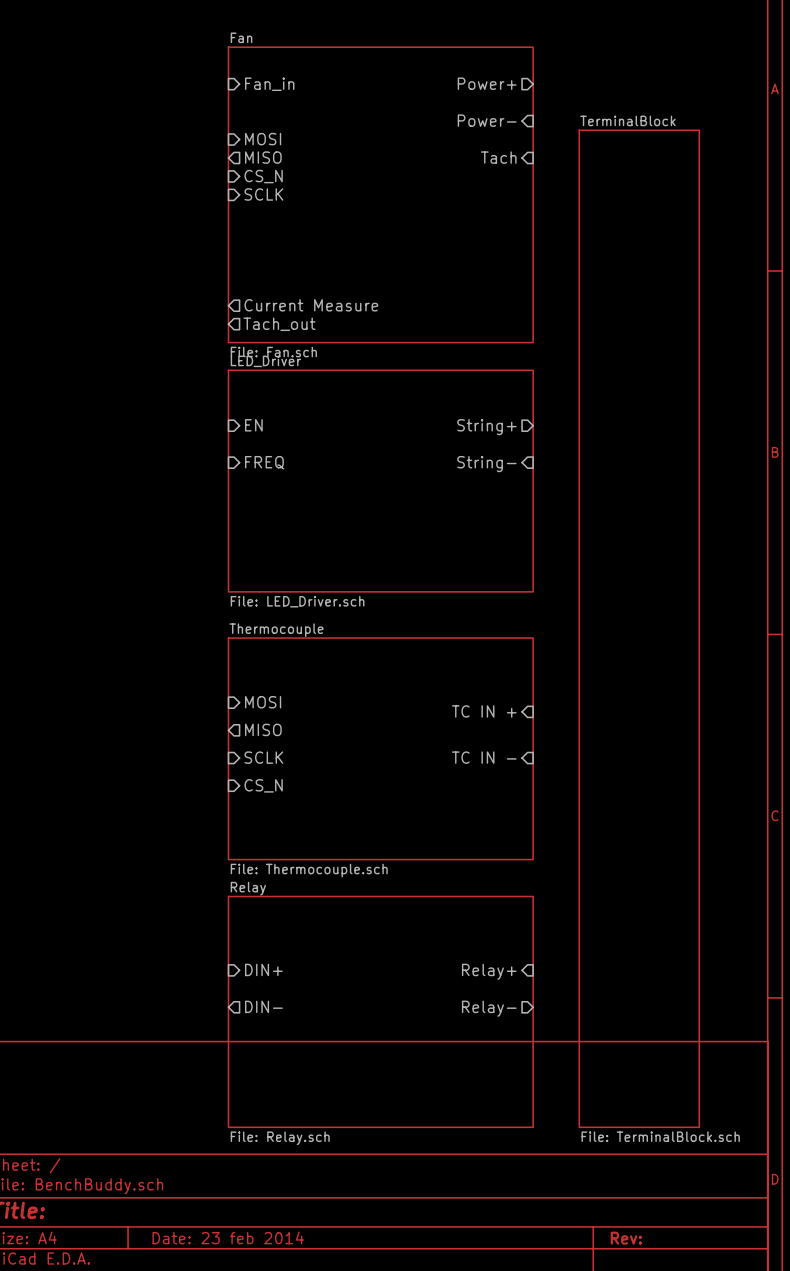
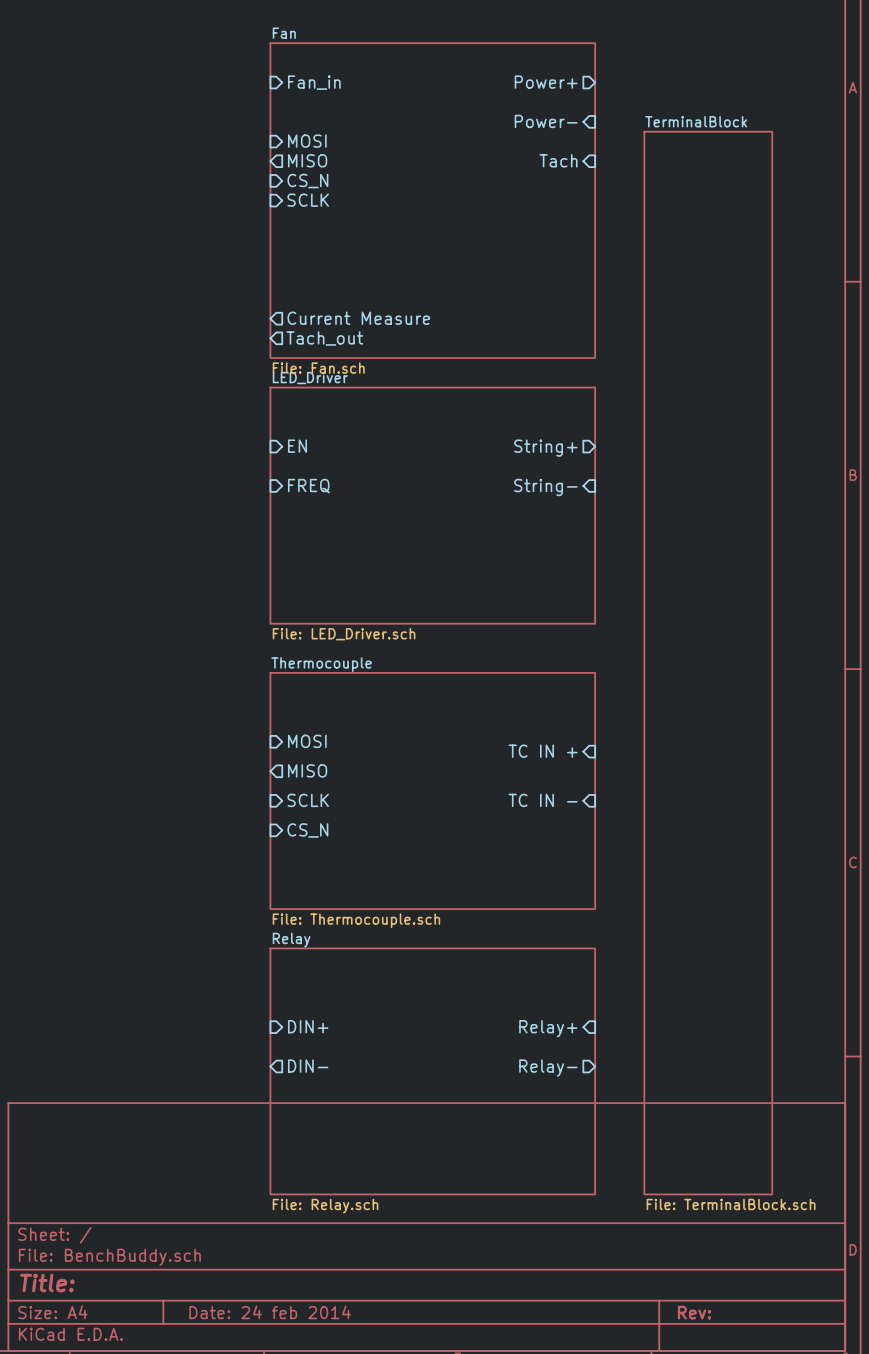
title block: Date: 23 feb 2014 (228, 1237) -> Date: 24 feb 2014 (270, 1312)

